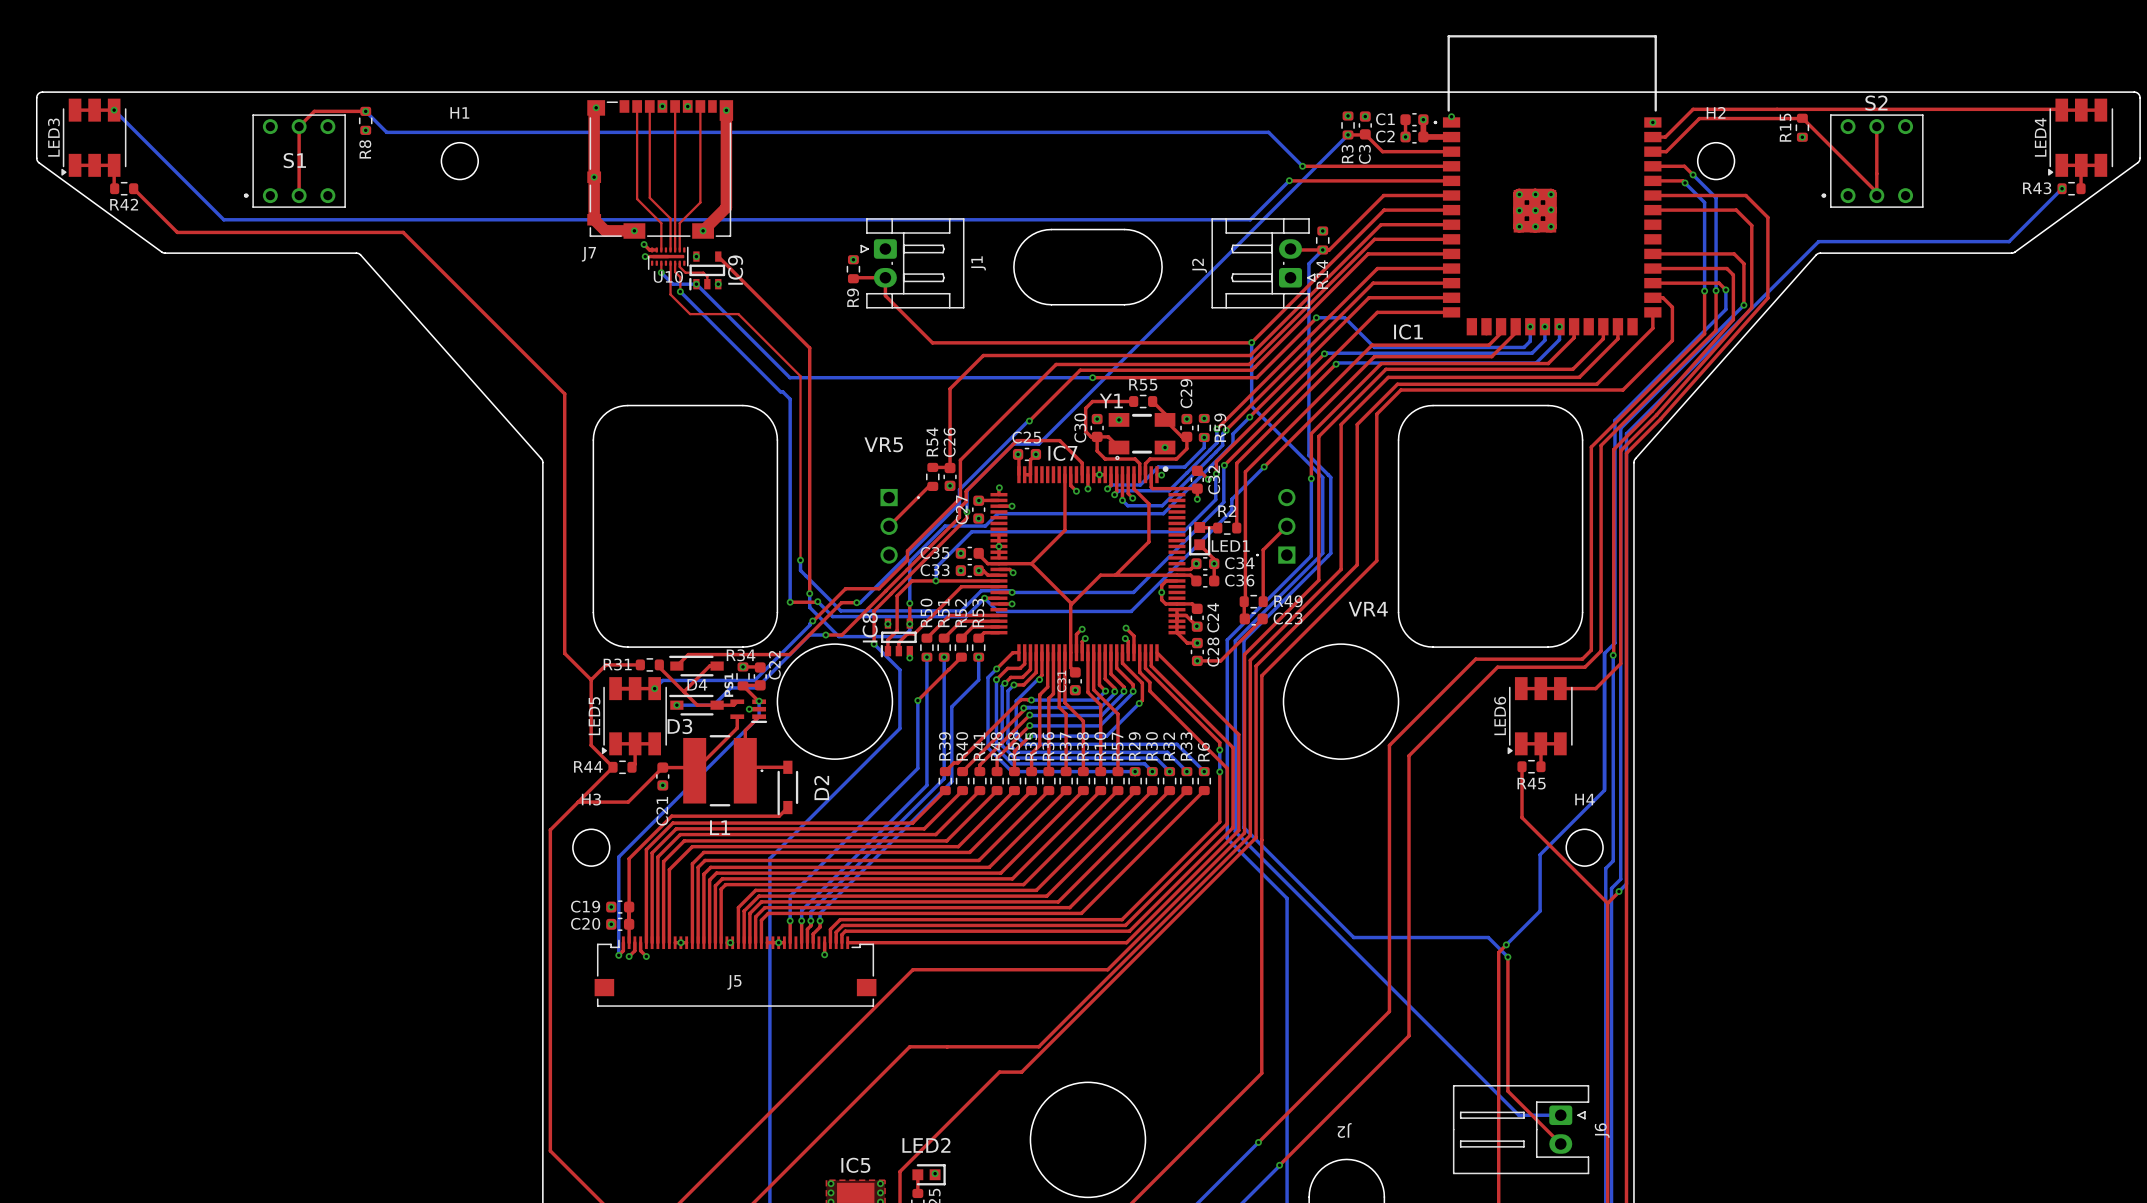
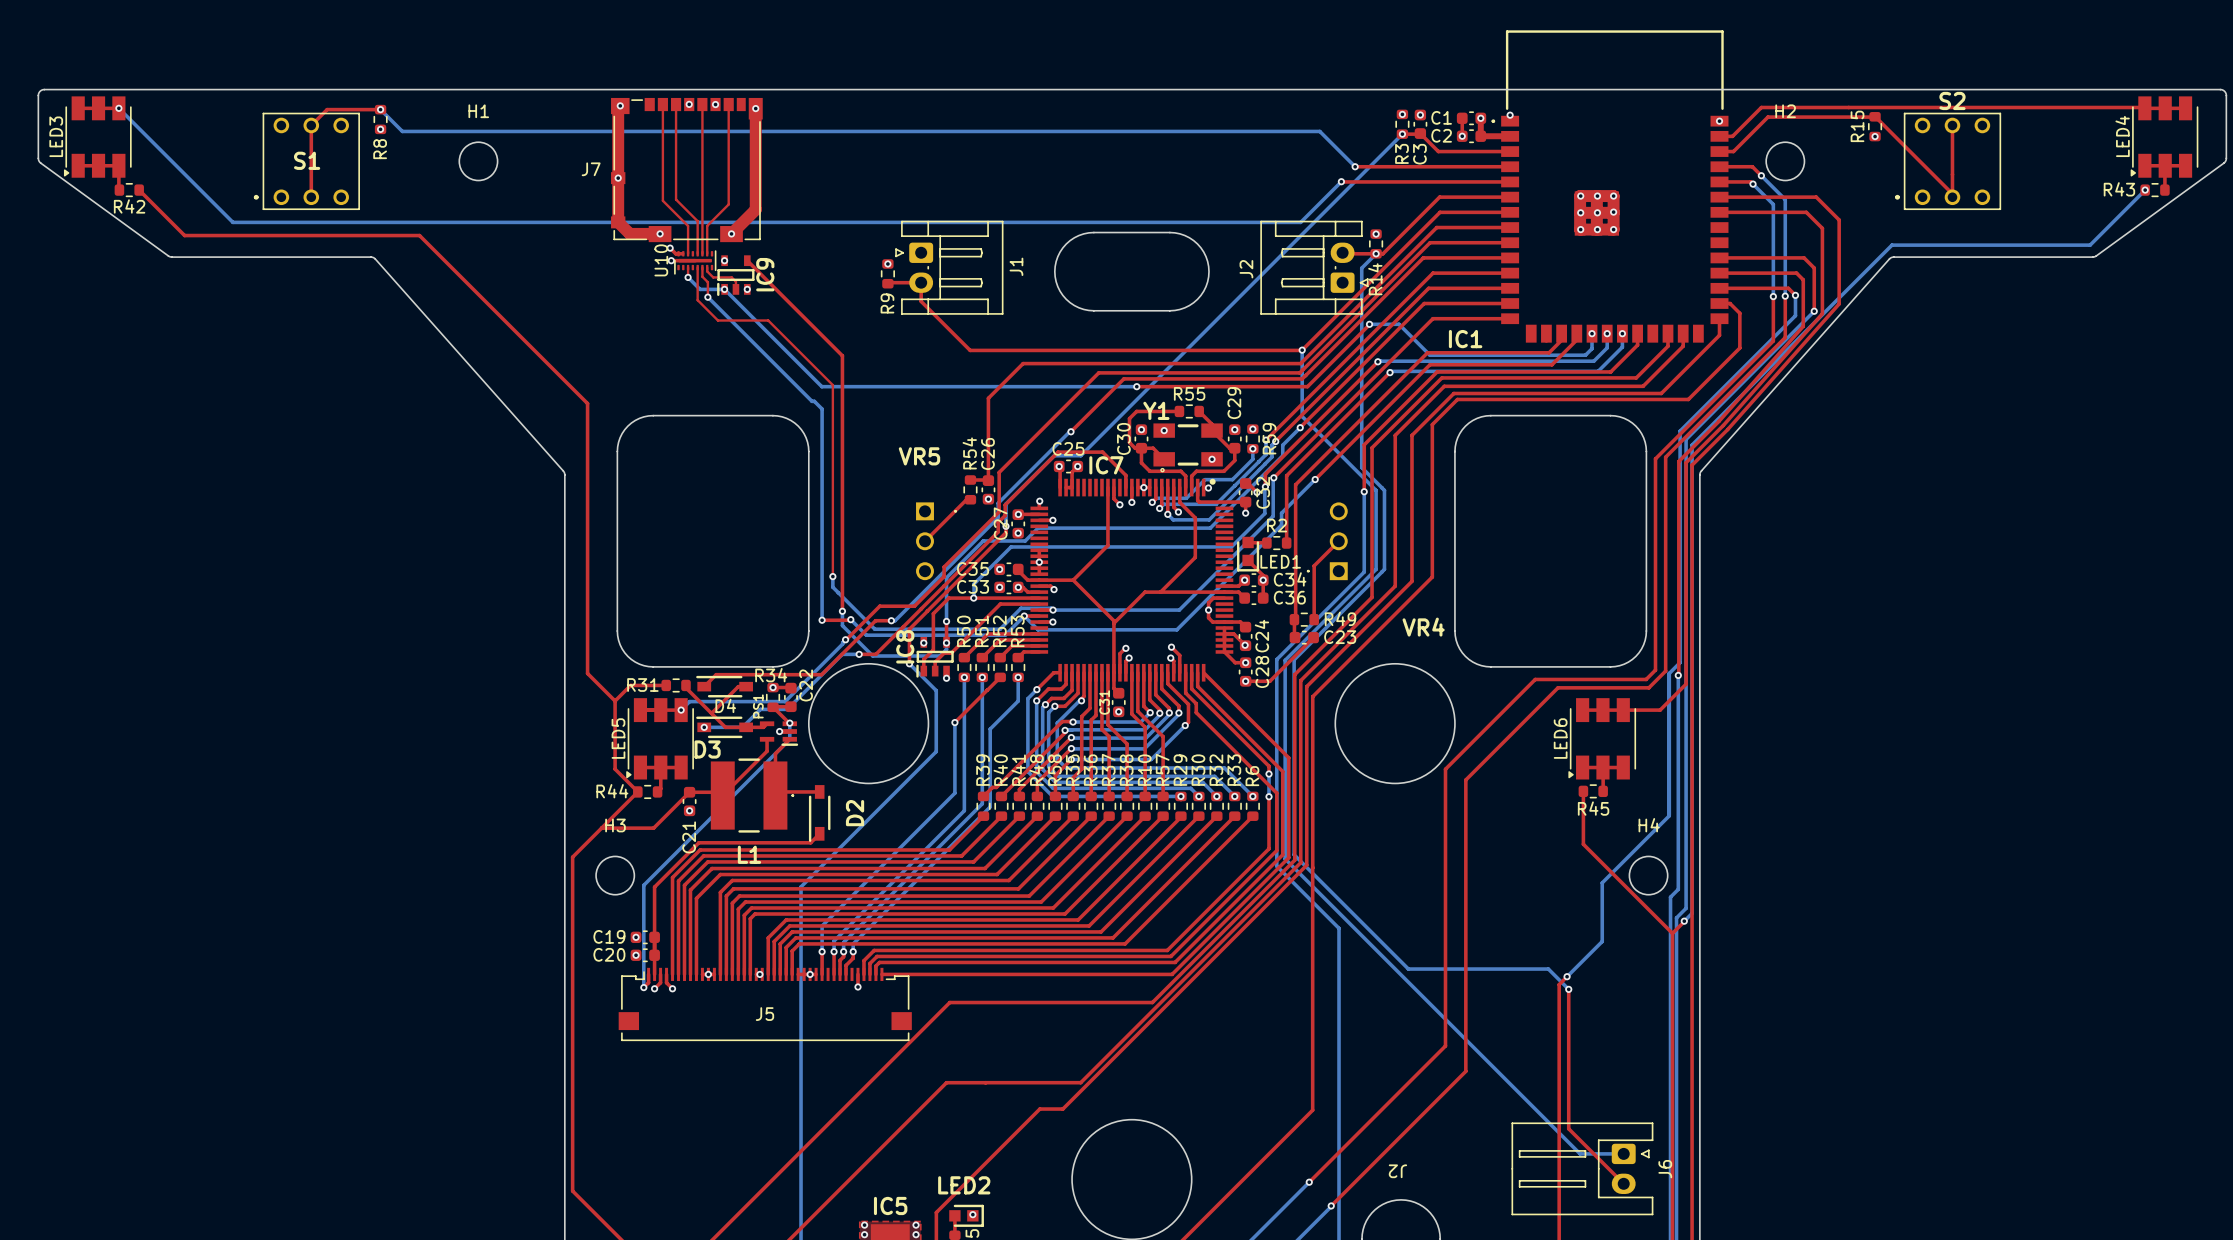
J7 name position: J7 (588, 254) -> J7 (591, 169)
U10 name rotation: 0° (668, 276) -> 90° counterclockwise (661, 260)

